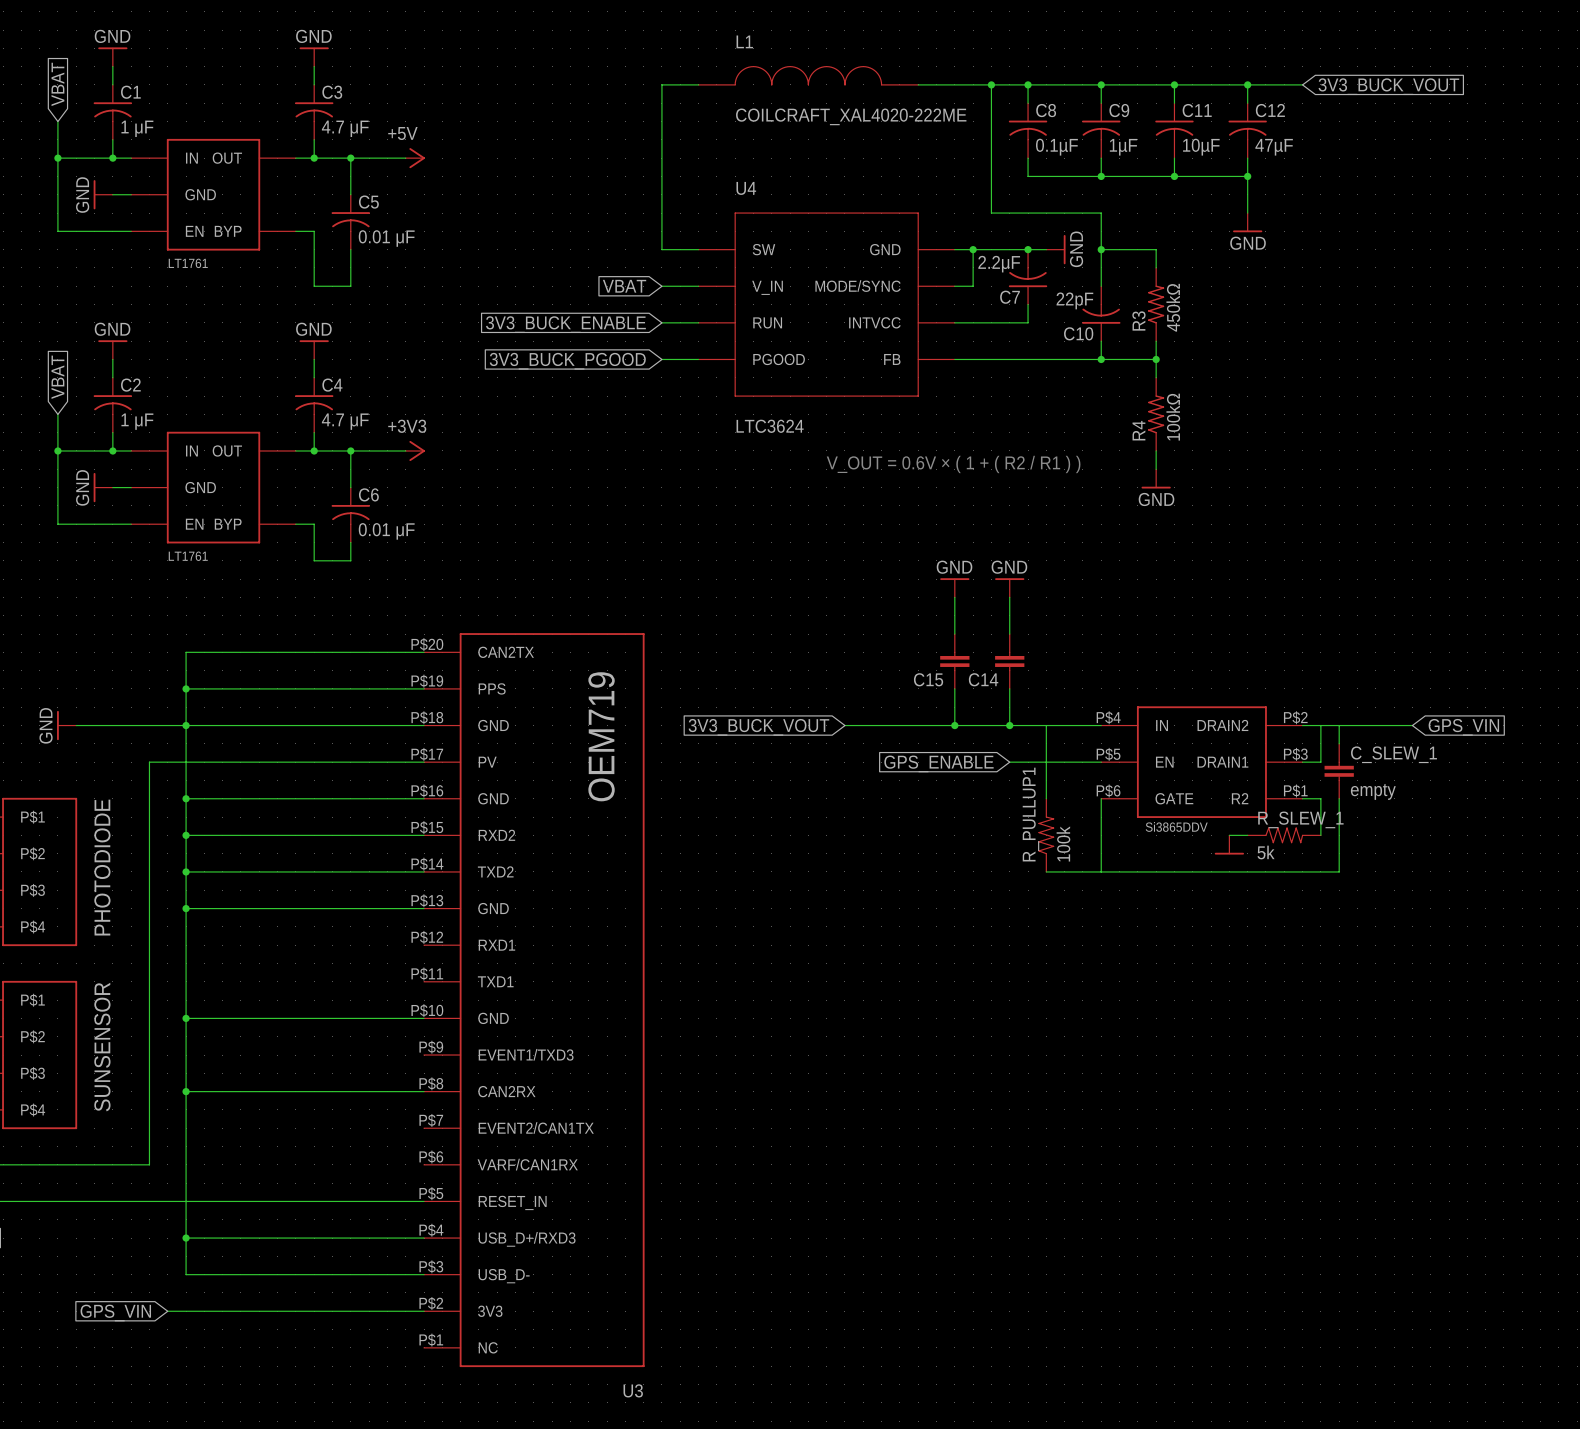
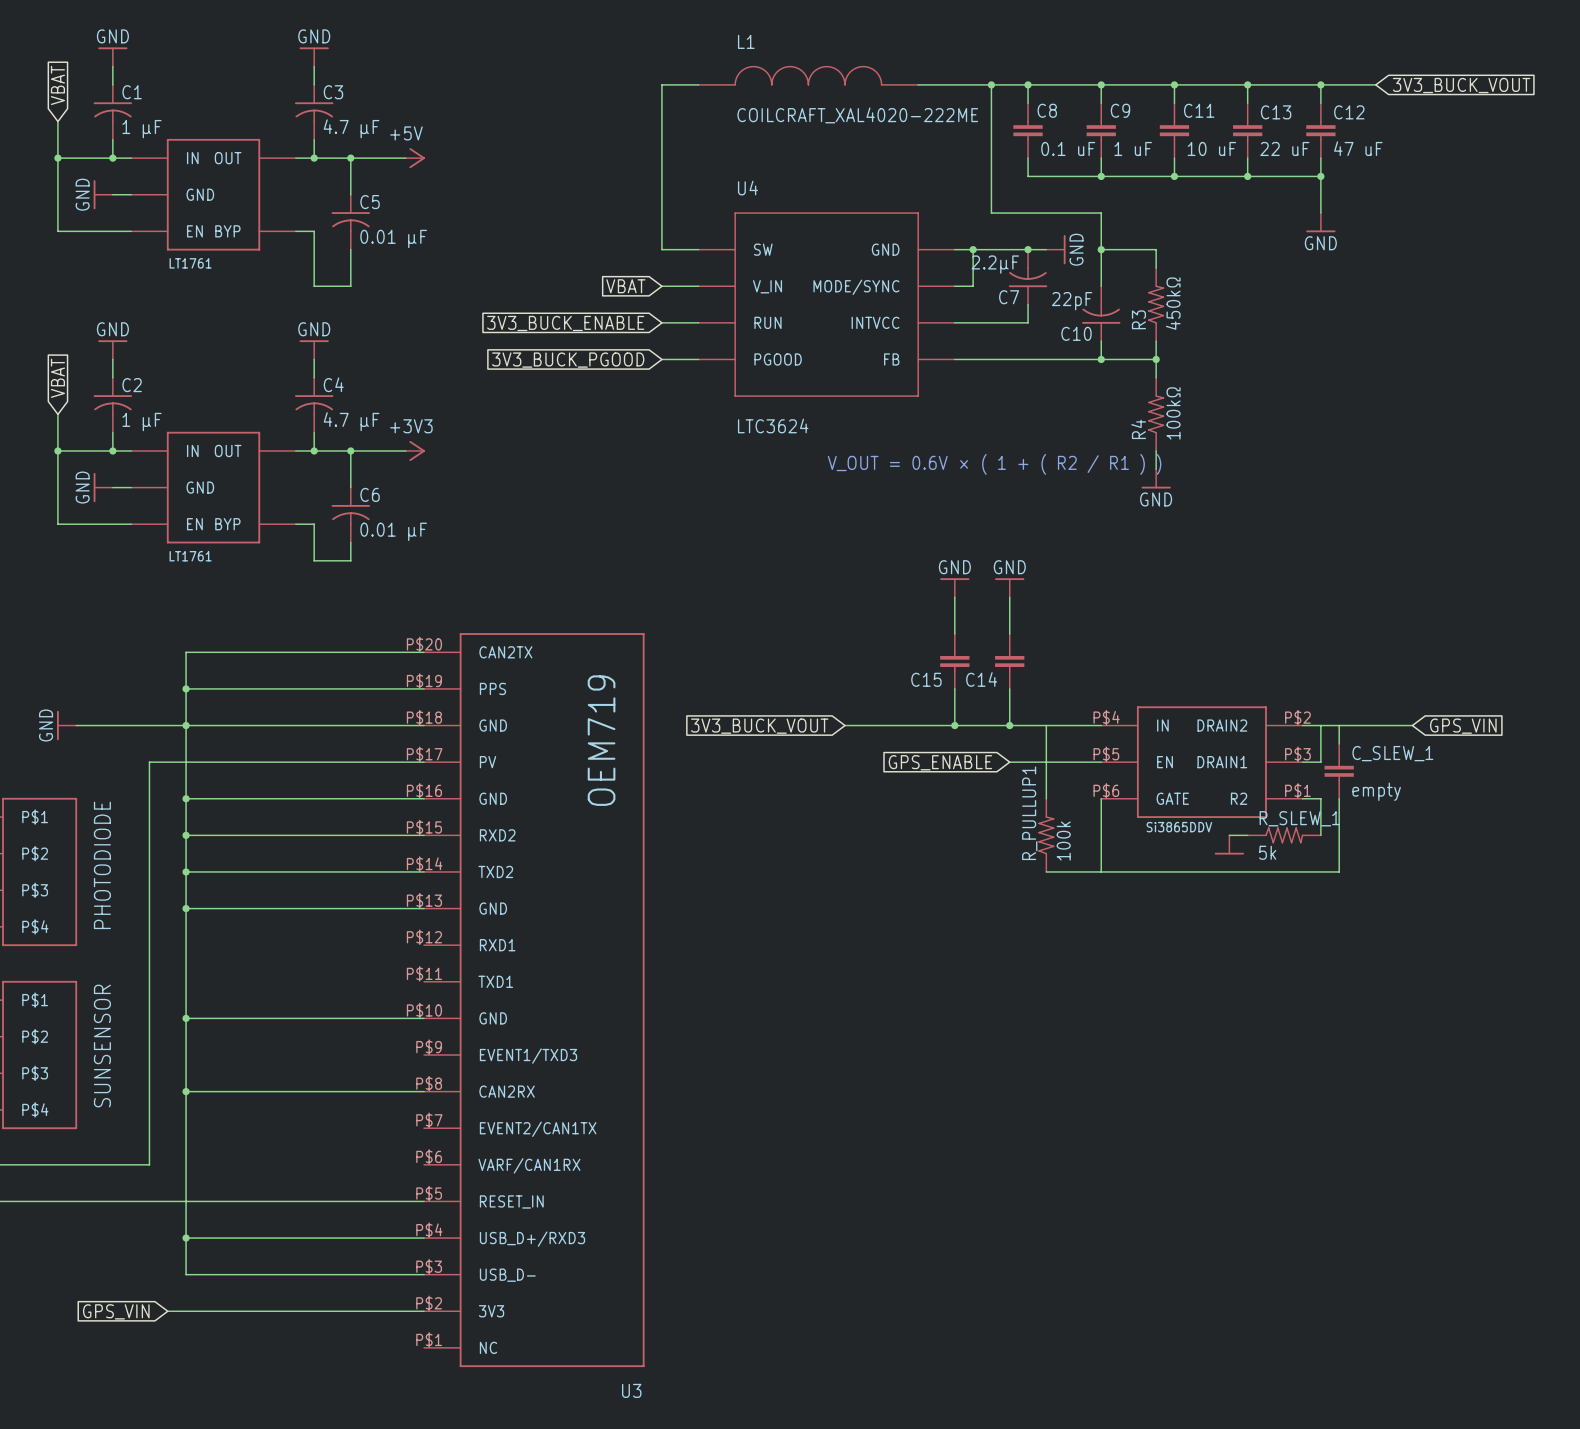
wire: none -> (1302, 84) (1375, 84)
wire: none -> (1320, 84) (1320, 103)
junction: none -> (1320, 84)
global label position: 3V3_BUCK_VOUT (1388, 86) -> 3V3_BUCK_VOUT (1461, 85)
C8 symbol: [1008, 103, 1048, 159] -> [1013, 103, 1043, 159]
C9 symbol: [1082, 103, 1121, 159] -> [1086, 103, 1116, 159]
C11 symbol: [1155, 103, 1194, 159] -> [1159, 103, 1190, 159]
C12 symbol: [1228, 103, 1267, 159] -> [1306, 103, 1336, 159]
C13: none -> 22 uF (1247, 130)
C8 value: 0.1µF (1056, 147) -> 0.1 uF (1068, 148)
C9 value: 1µF (1123, 147) -> 1 uF (1133, 148)
C11 value: 10µF (1201, 147) -> 10 uF (1211, 148)
C12 value: 47µF (1274, 147) -> 47 uF (1358, 148)
wire: none -> (1320, 158) (1320, 213)
wire: (1247, 176) (1247, 213) -> (1247, 176) (1320, 176)
junction: none -> (1320, 176)
power symbol position: GND (1247, 222) -> GND (1320, 222)

